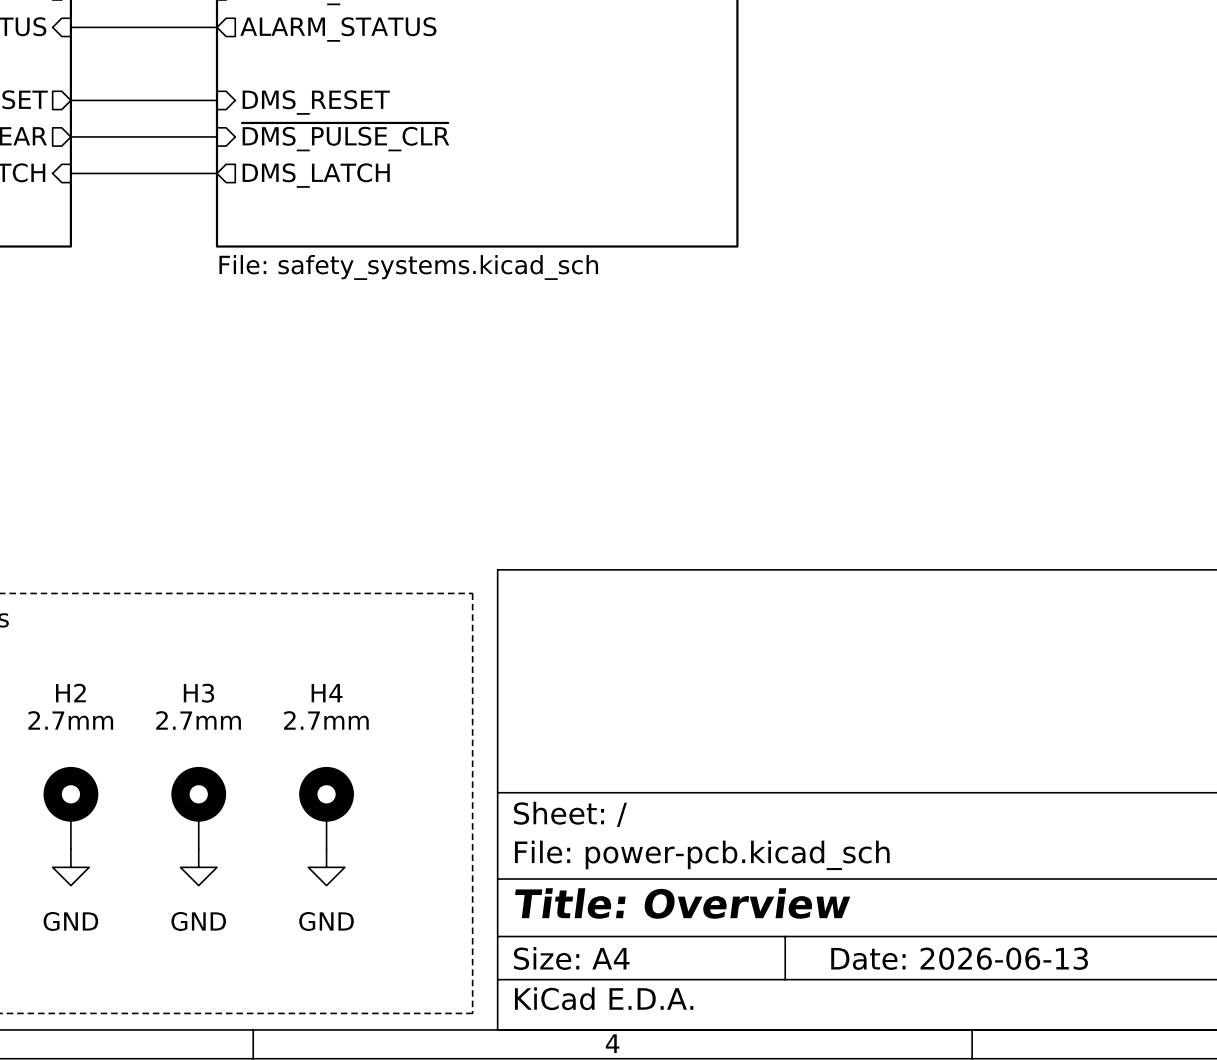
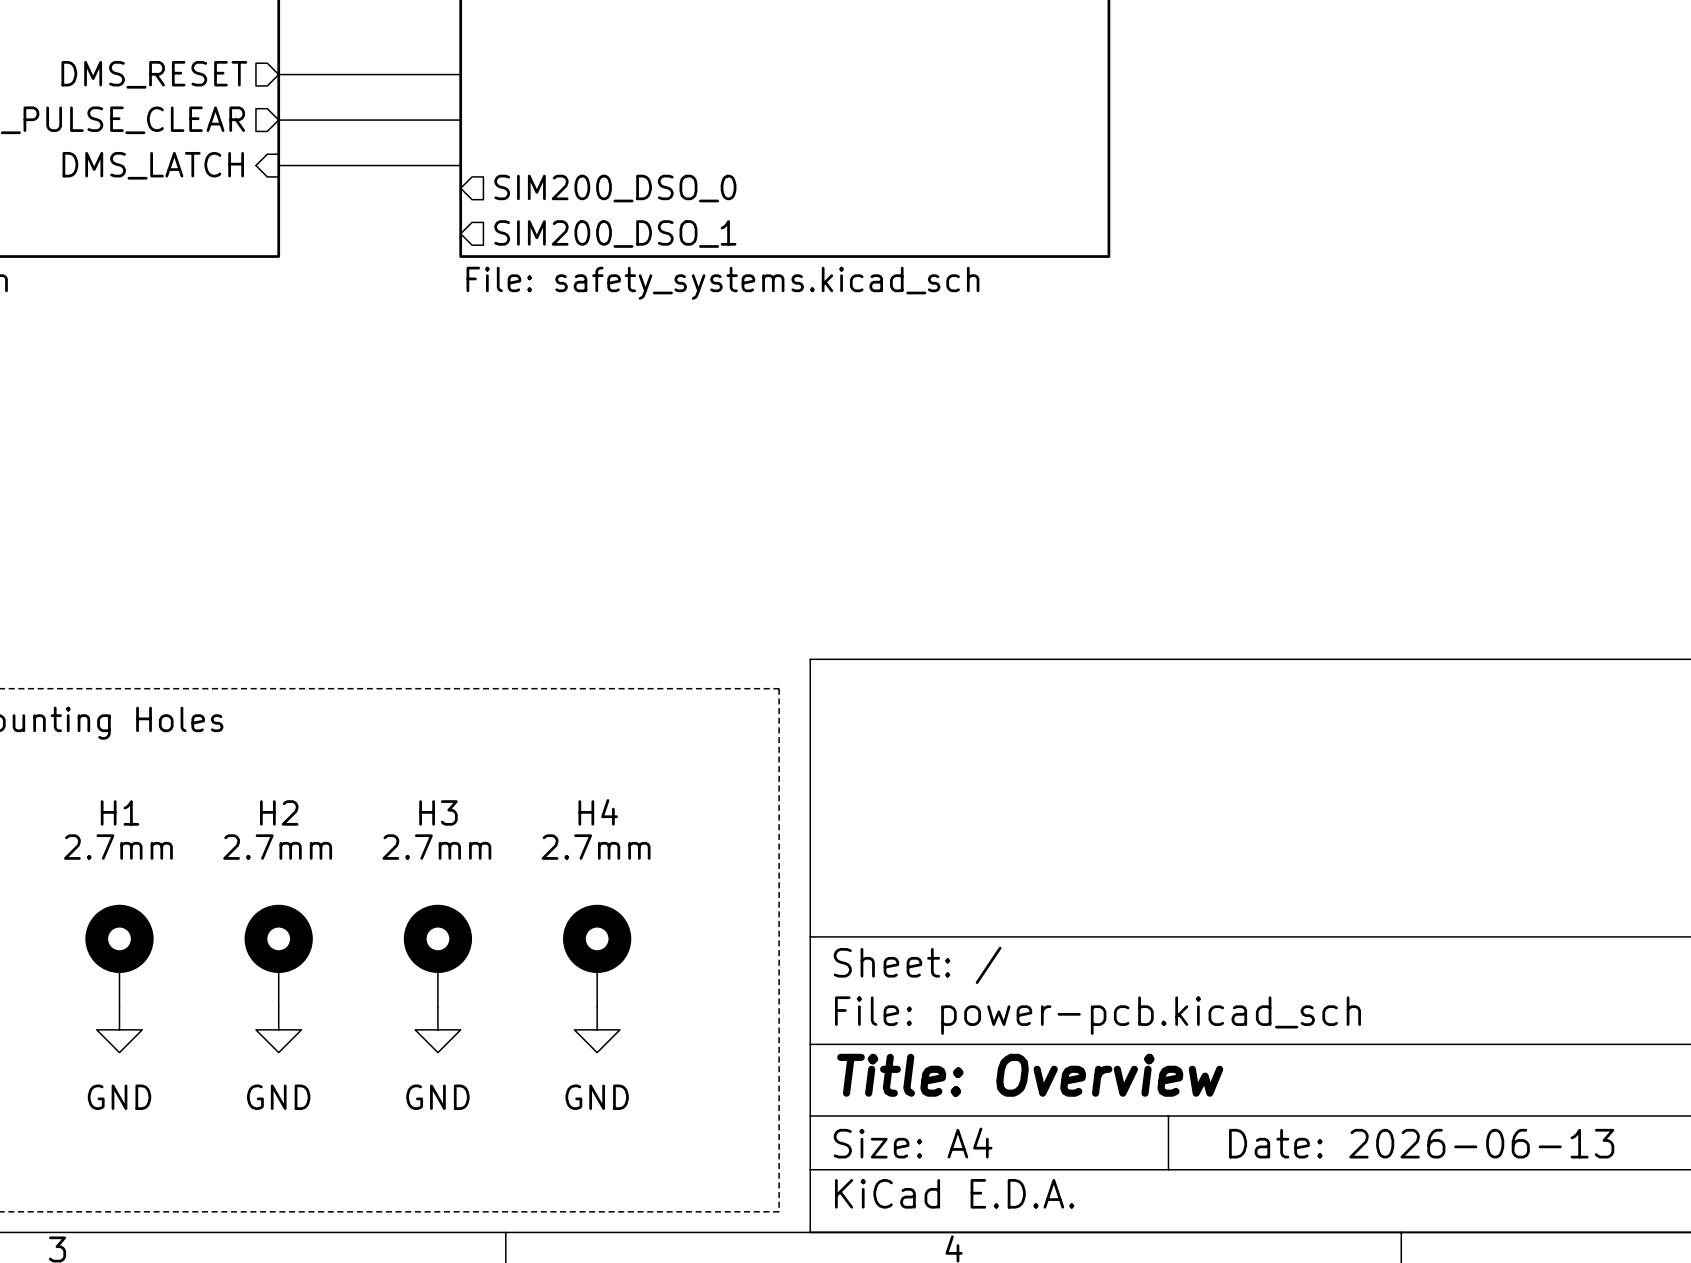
sheet pin: DMS_RESET (316, 102) -> none
sheet pin: ~{DMS_PULSE_CLR} (345, 137) -> none
sheet pin: DMS_LATCH (316, 175) -> none
sheet pin: none -> SIM200_DSO_0 (615, 188)
sheet pin: none -> SIM200_DSO_1 (615, 234)

